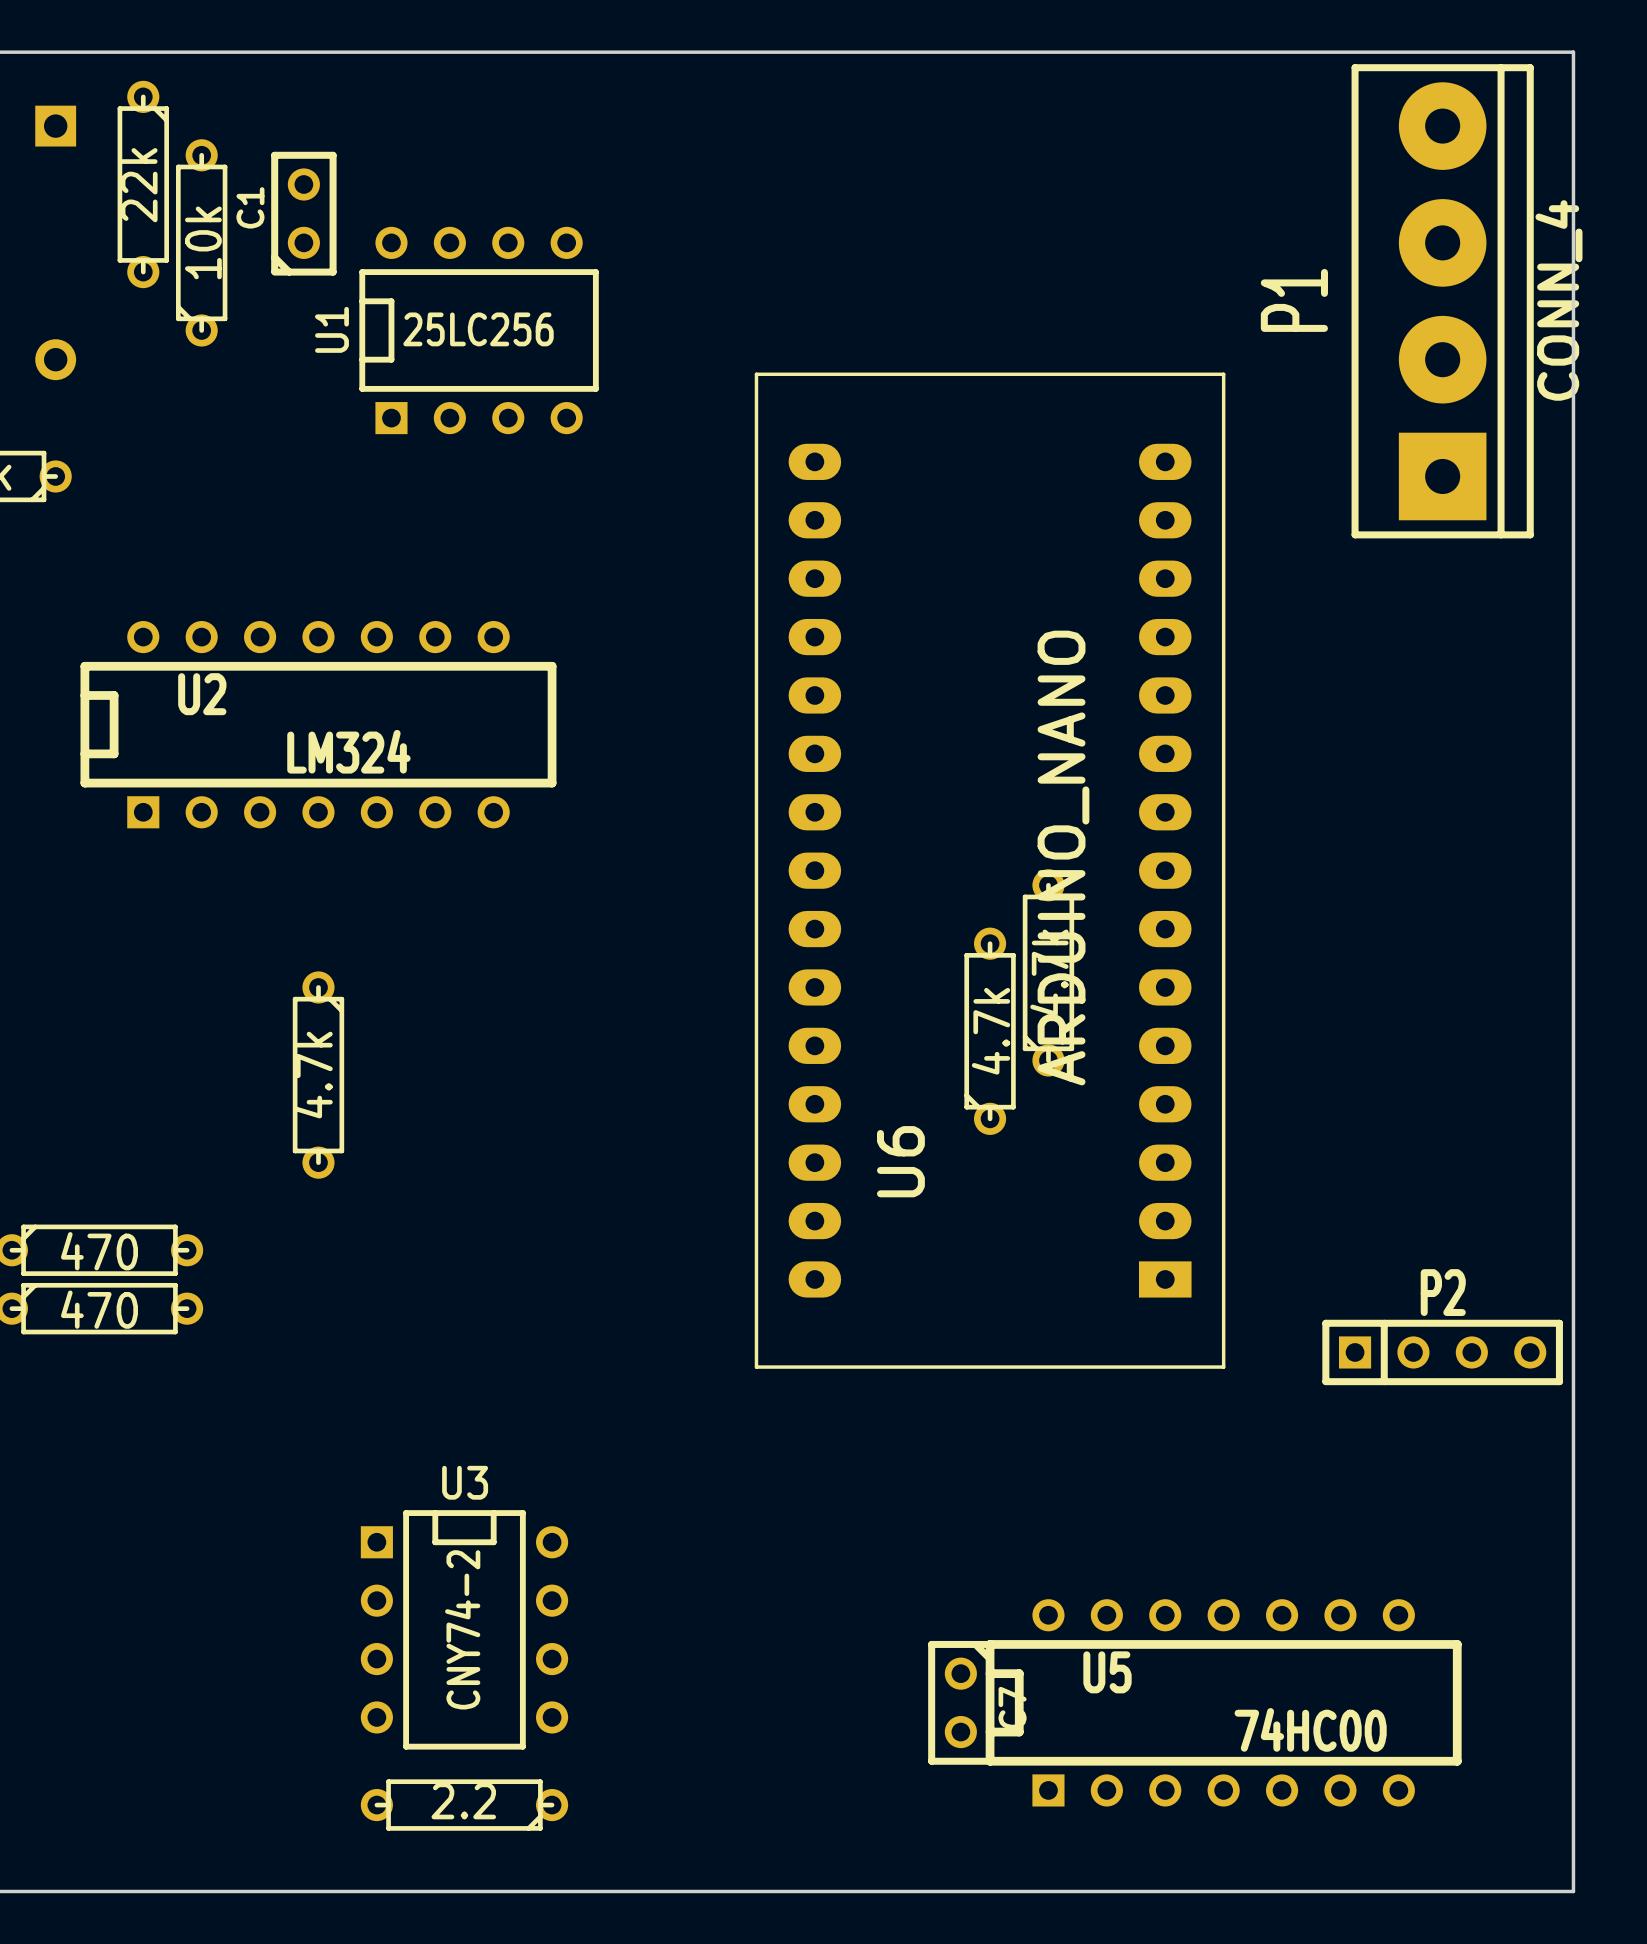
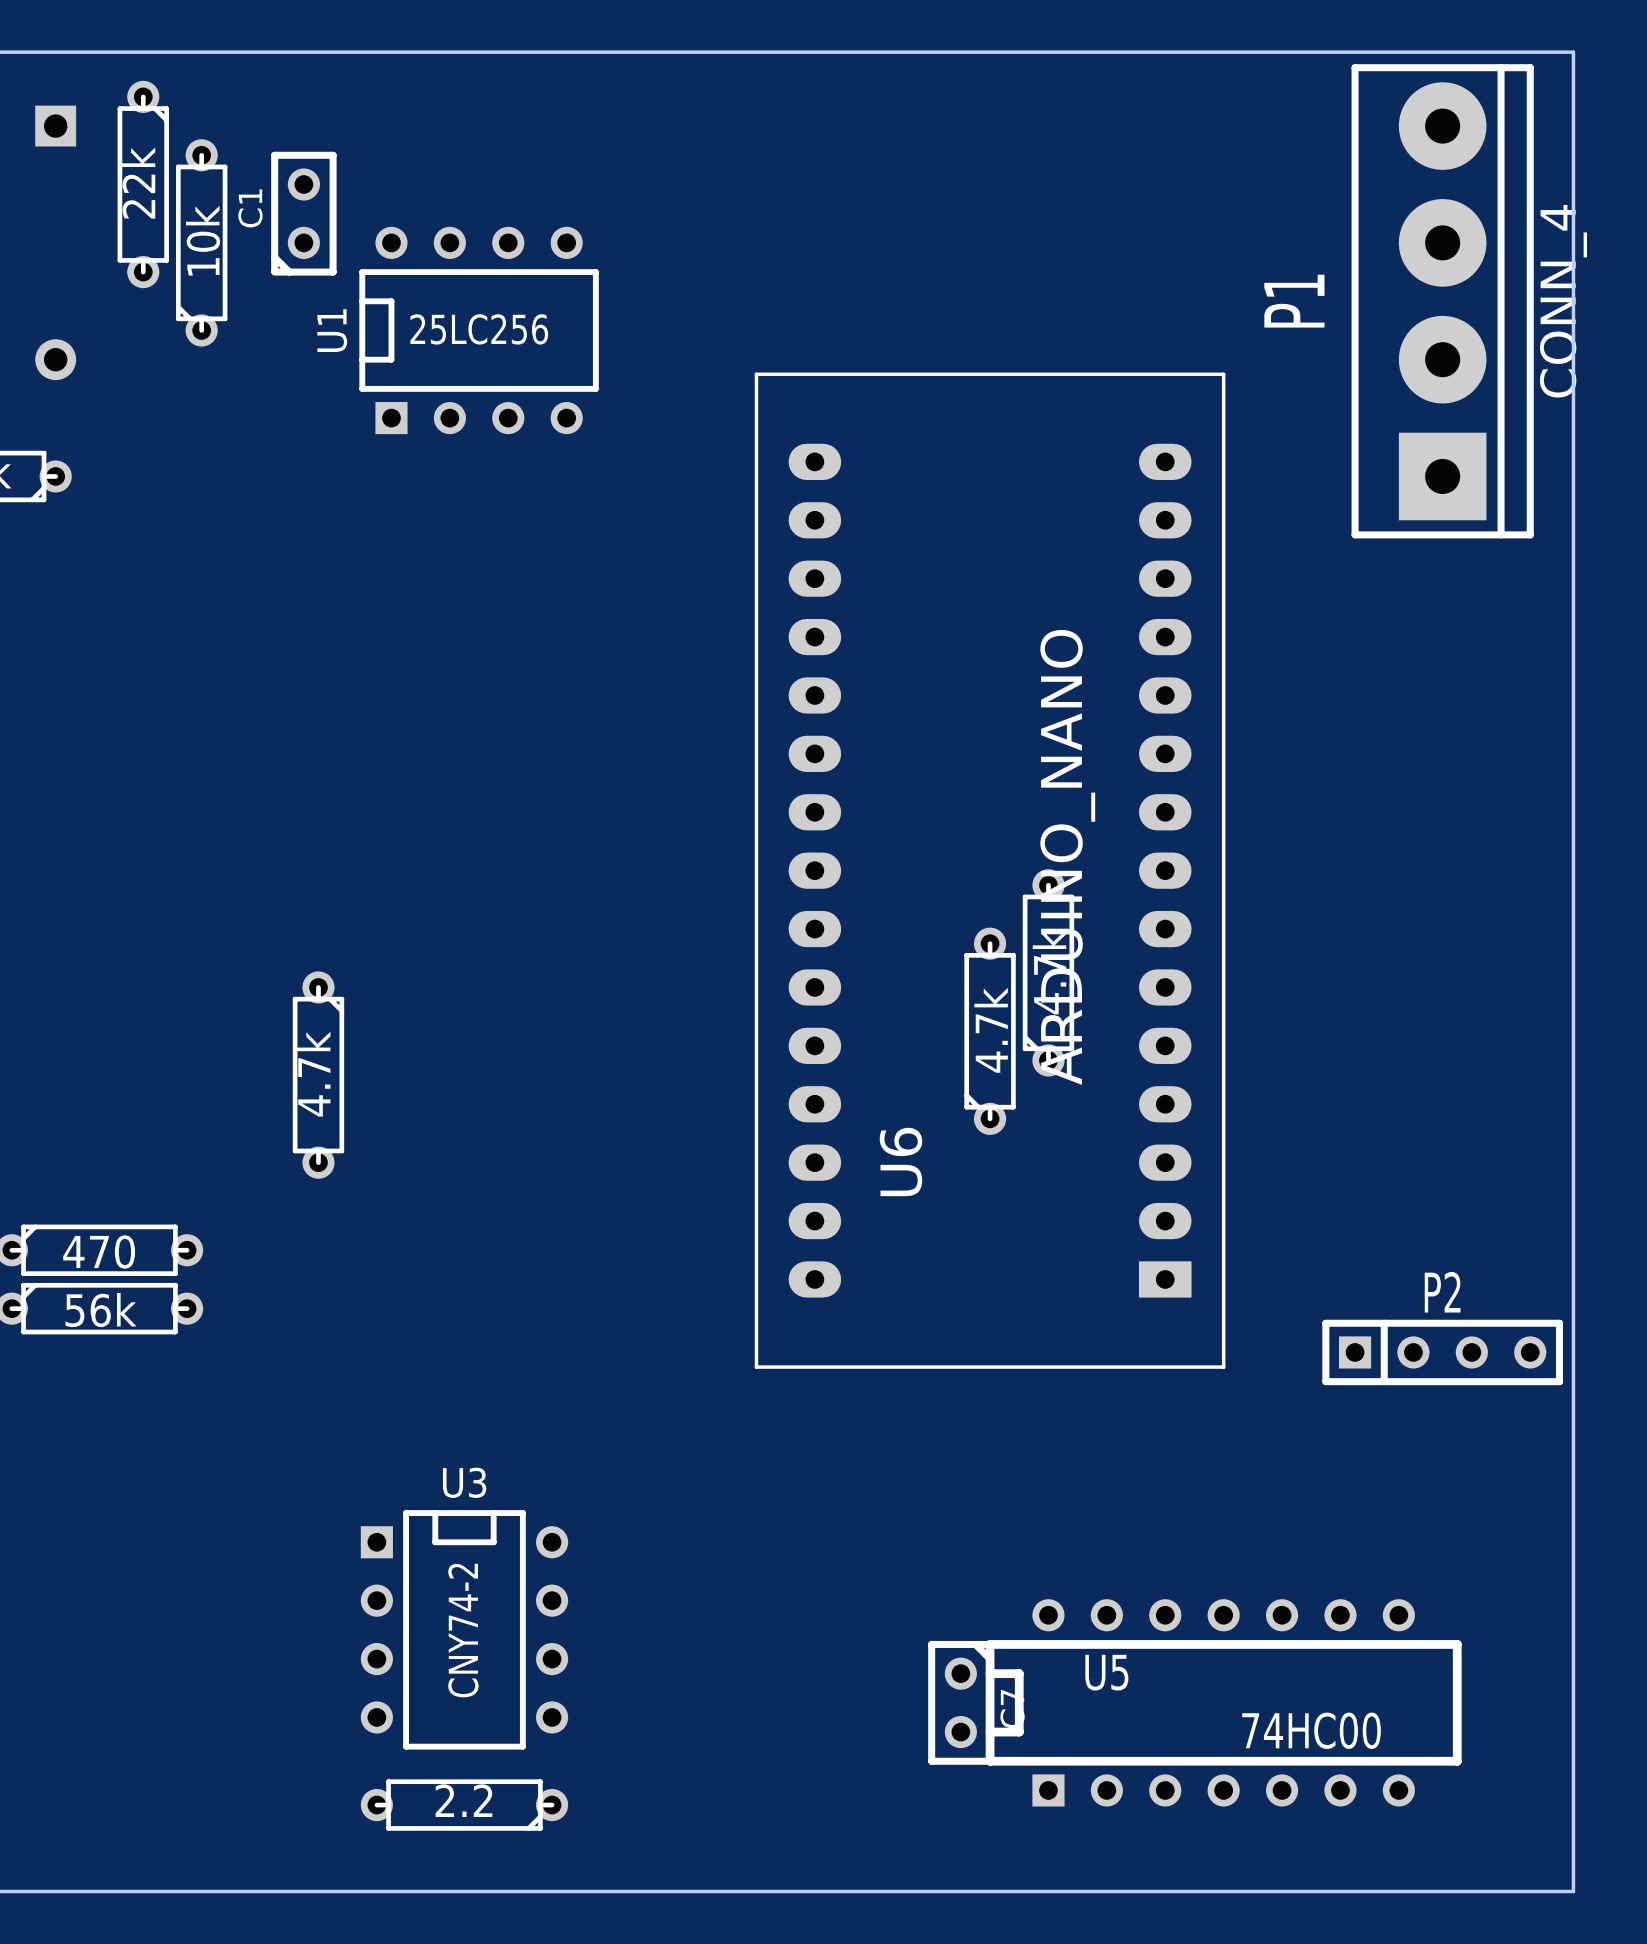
U2: LM324 (318, 724) -> none
part value: 470 (99, 1309) -> 56k (100, 1310)

